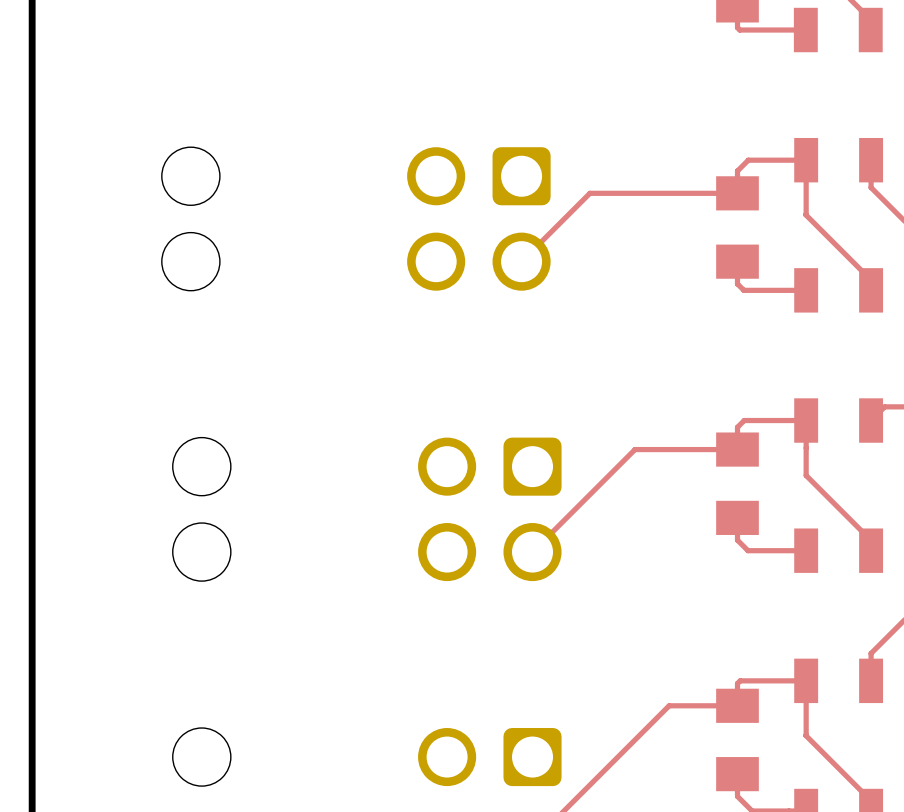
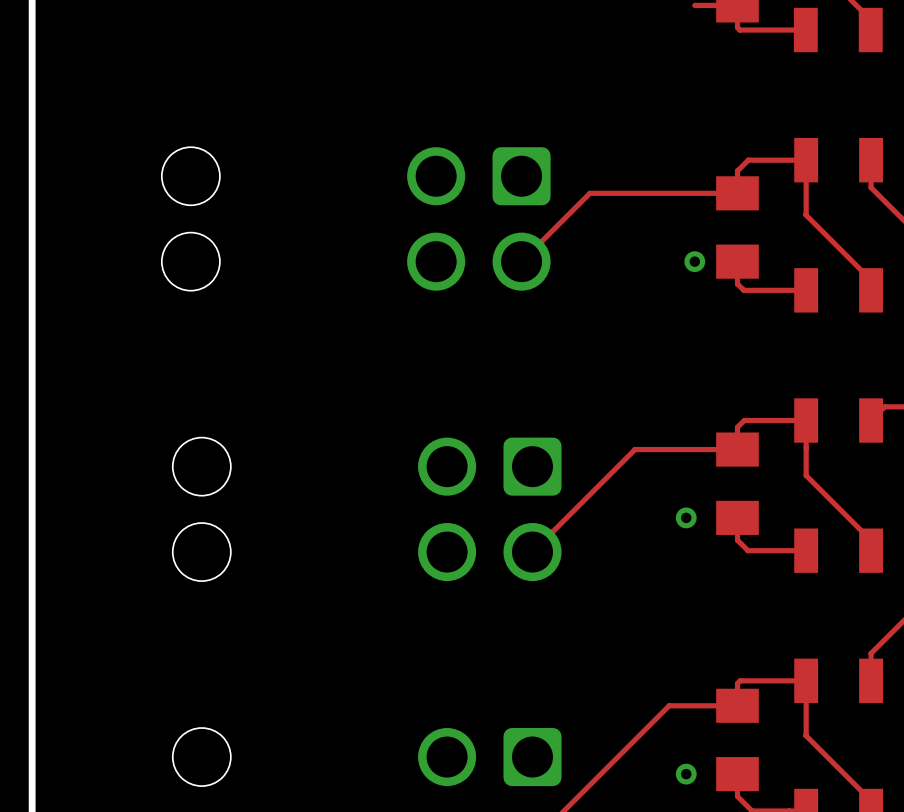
top track: none -> (737, 5) (694, 5)
via: none -> (694, 261)
via: none -> (686, 517)
via: none -> (686, 774)

